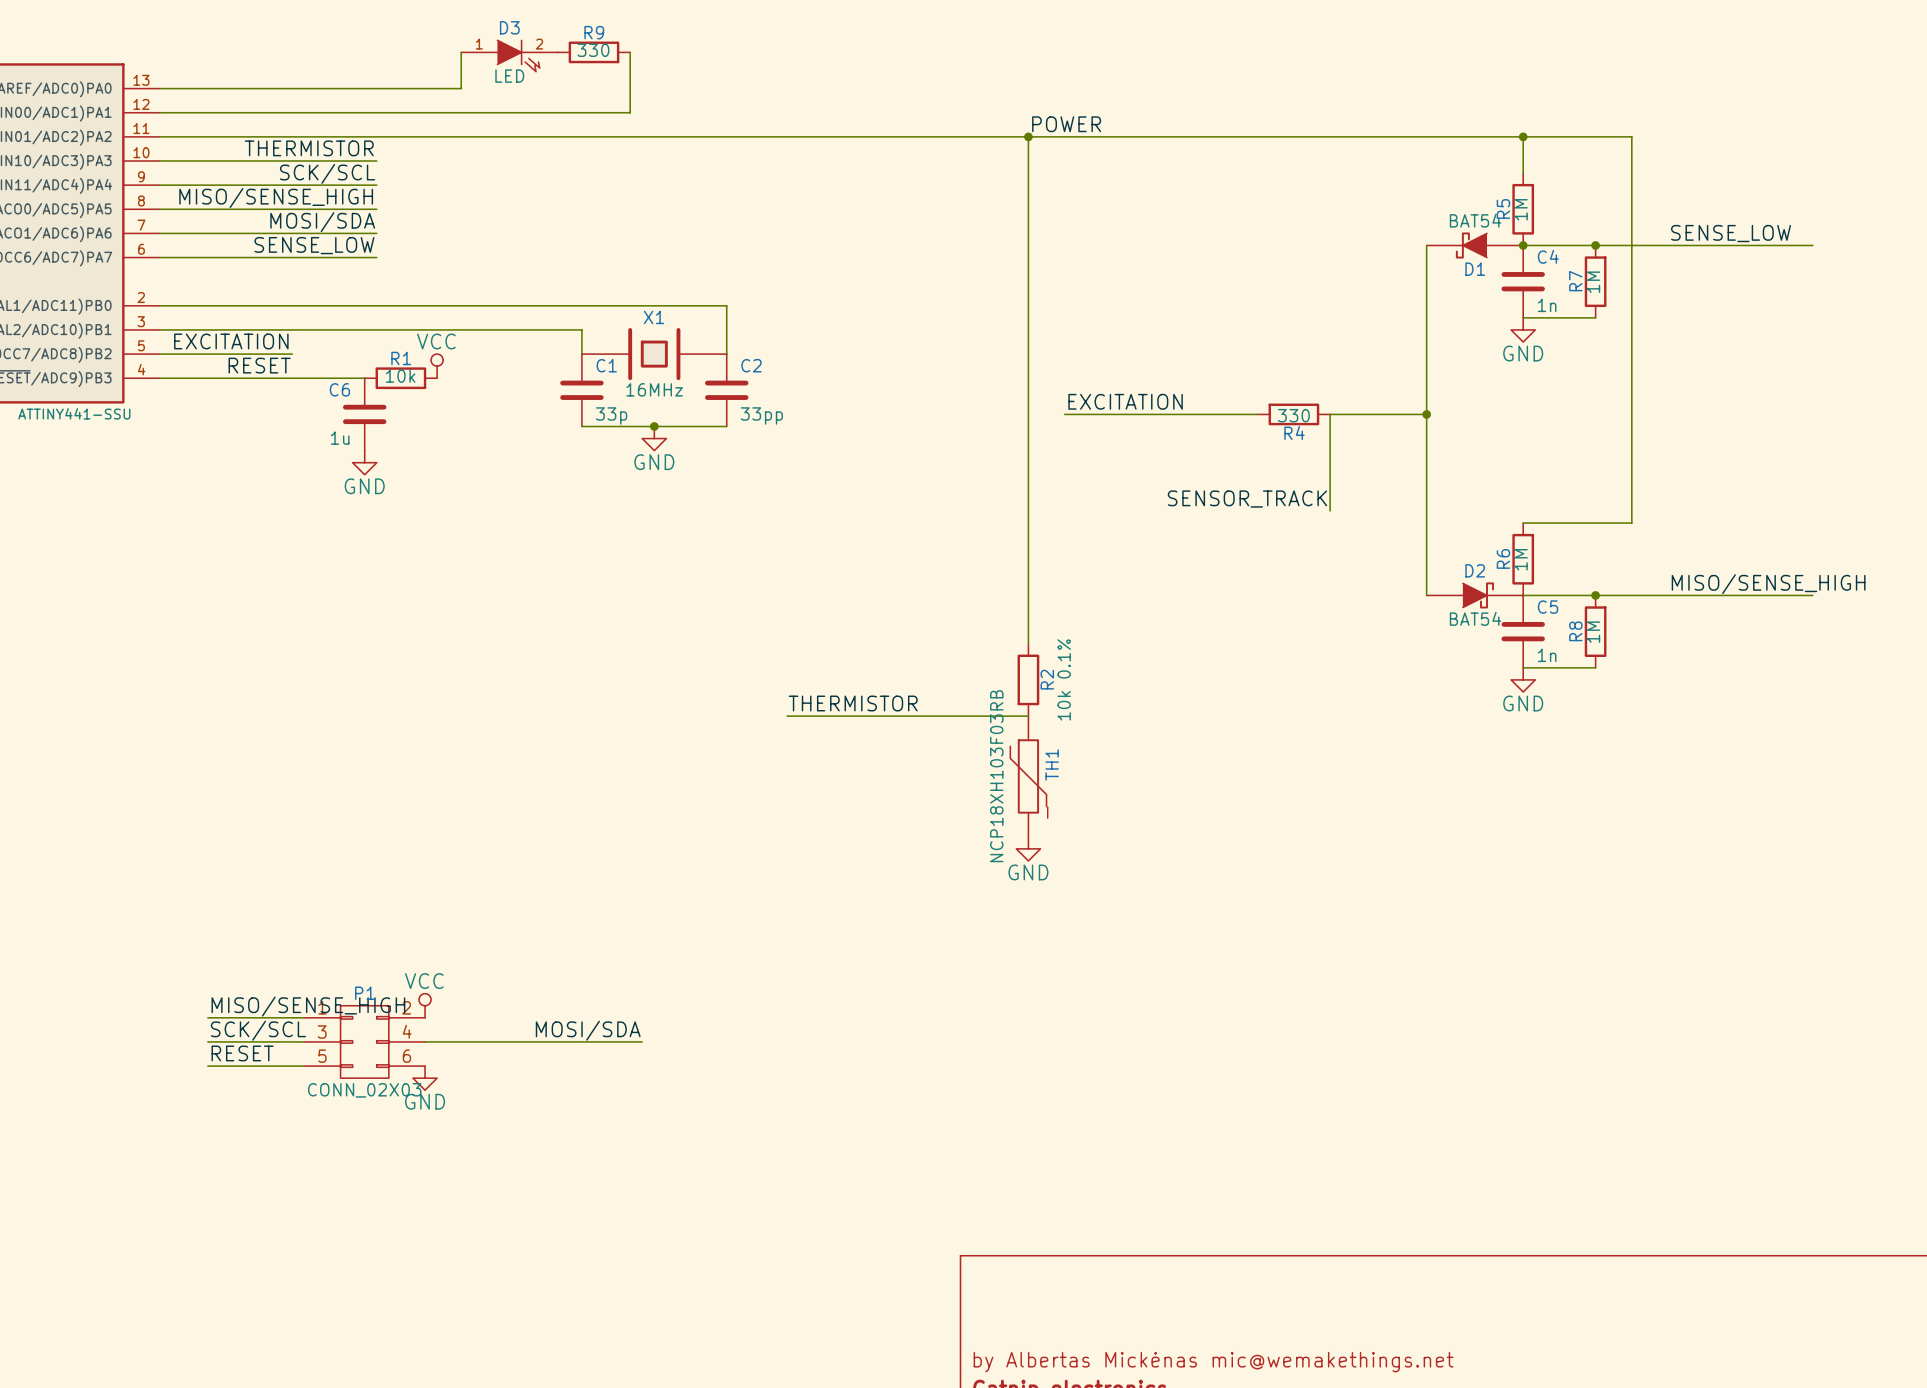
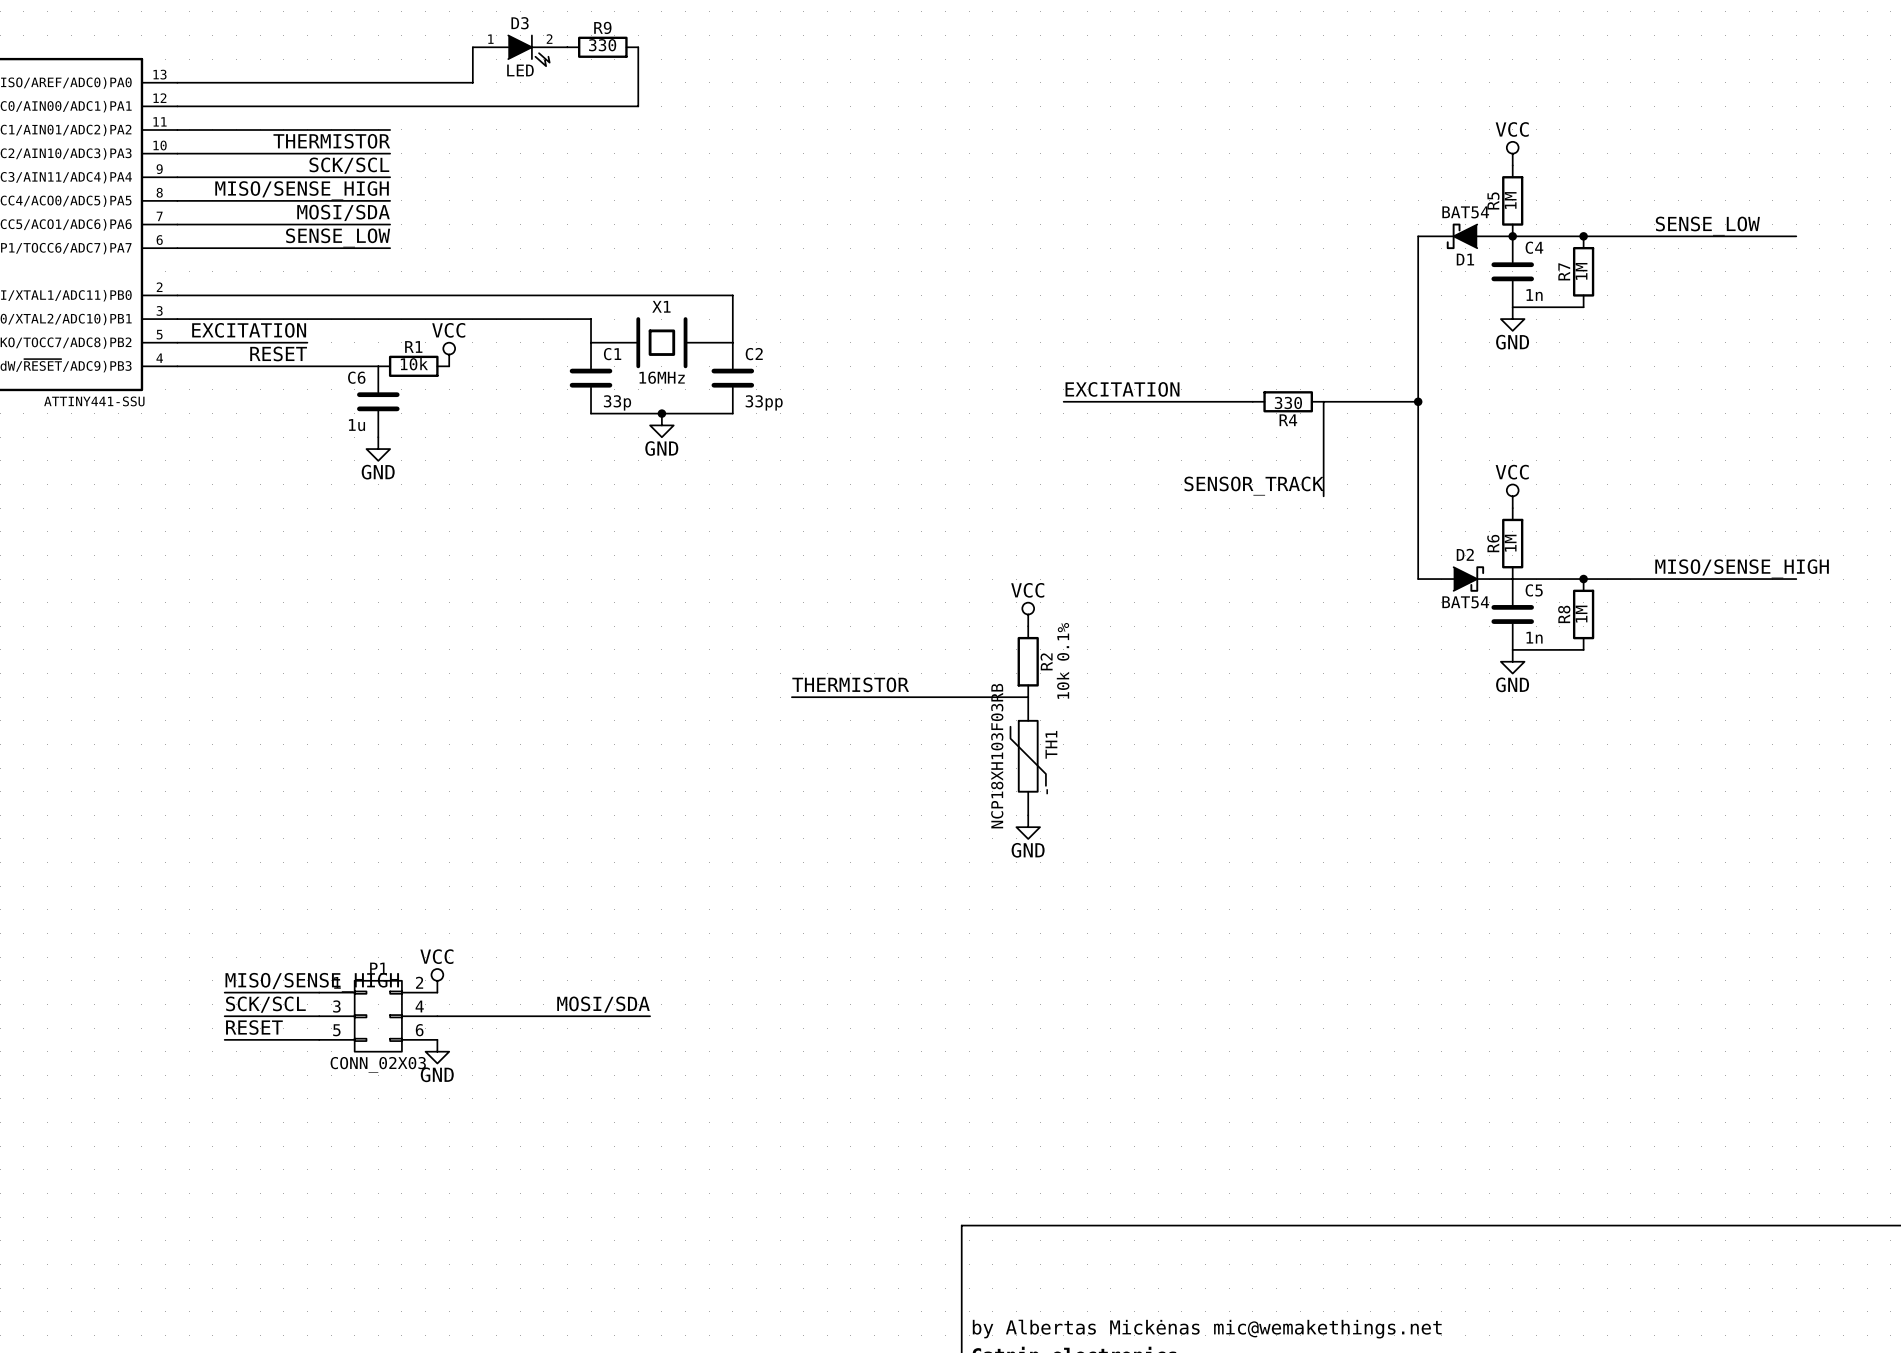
label: POWER (1066, 124) -> none
wire: (376, 136) (1631, 136) (1631, 523) (1523, 523) -> none
wire: (1028, 136) (1028, 643) -> none
junction: (1028, 136) -> none
wire: (1523, 136) (1523, 173) -> none
junction: (1523, 136) -> none
power symbol: none -> VCC (1512, 153)
power symbol: none -> VCC (1512, 496)
power symbol: none -> VCC (1028, 614)

